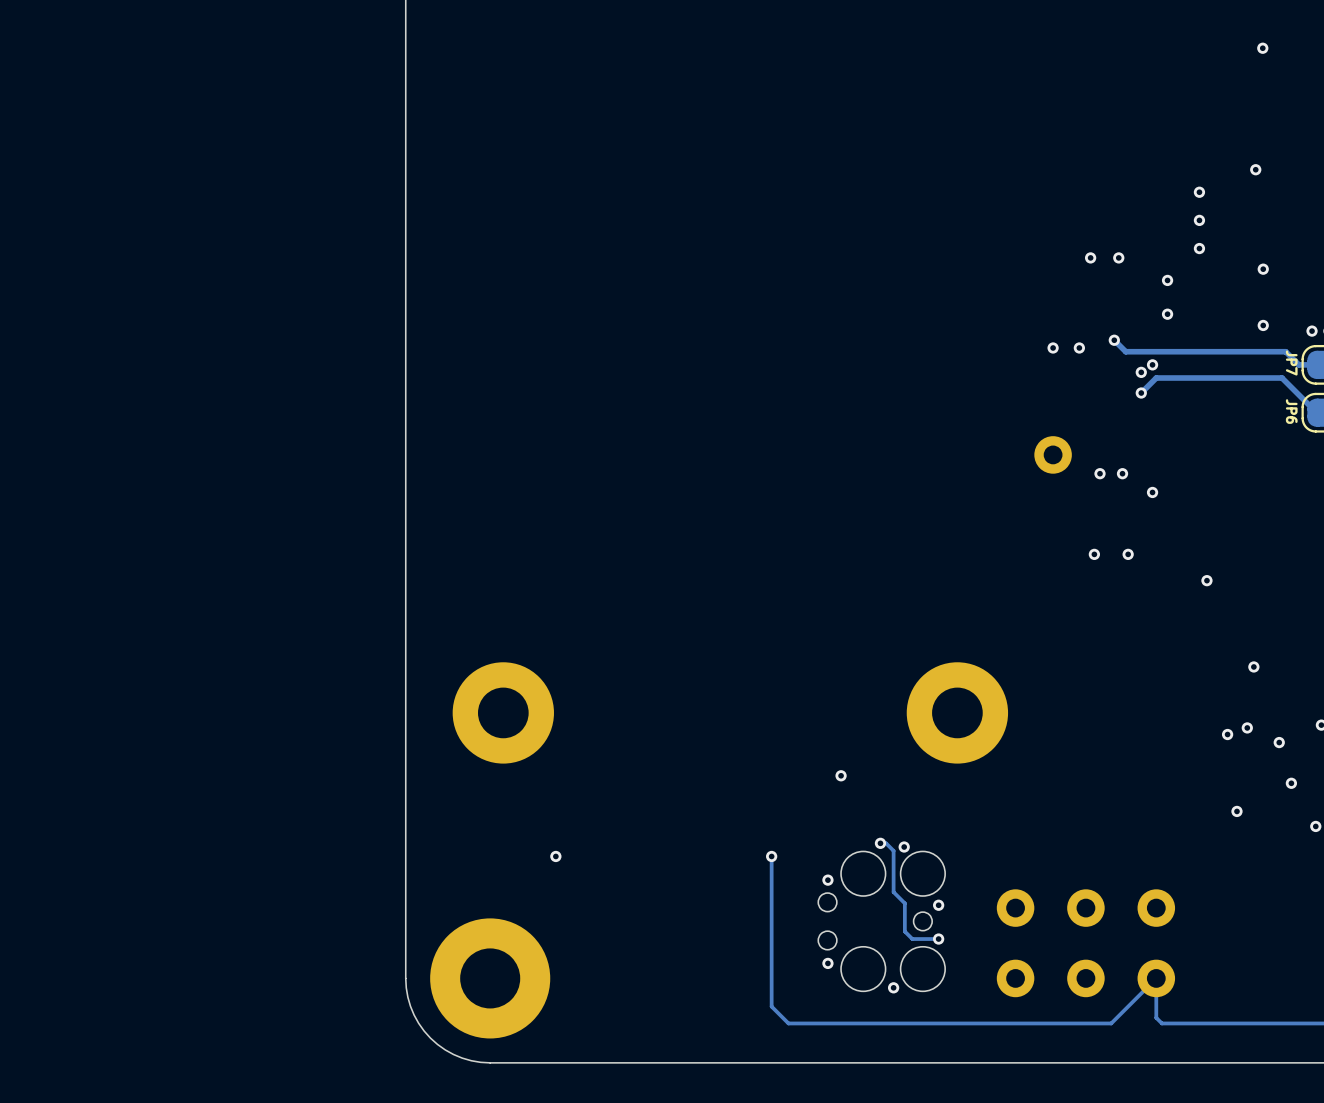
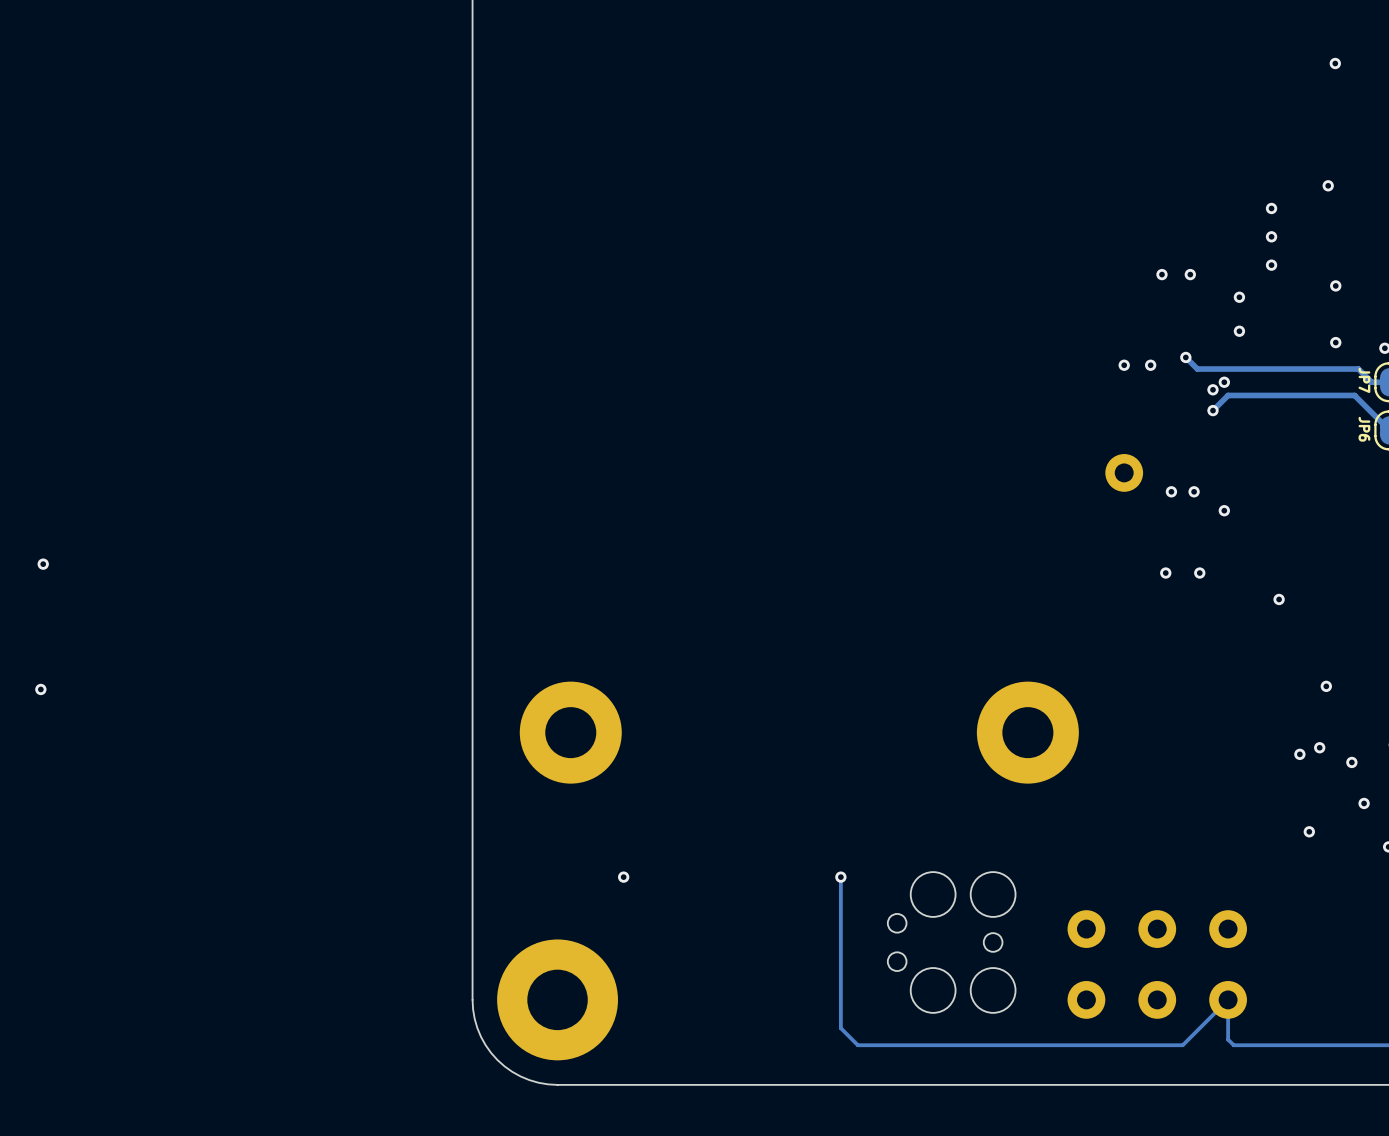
via: (841, 775) -> none
track: (880, 843) (886, 843) (893, 850) (893, 892) (904, 903) (904, 931) (912, 939) (938, 939) -> none
via: (880, 843) -> none
via: (904, 847) -> none
via: (827, 880) -> none
via: (938, 905) -> none
via: (938, 939) -> none
via: (827, 963) -> none
via: (893, 987) -> none

